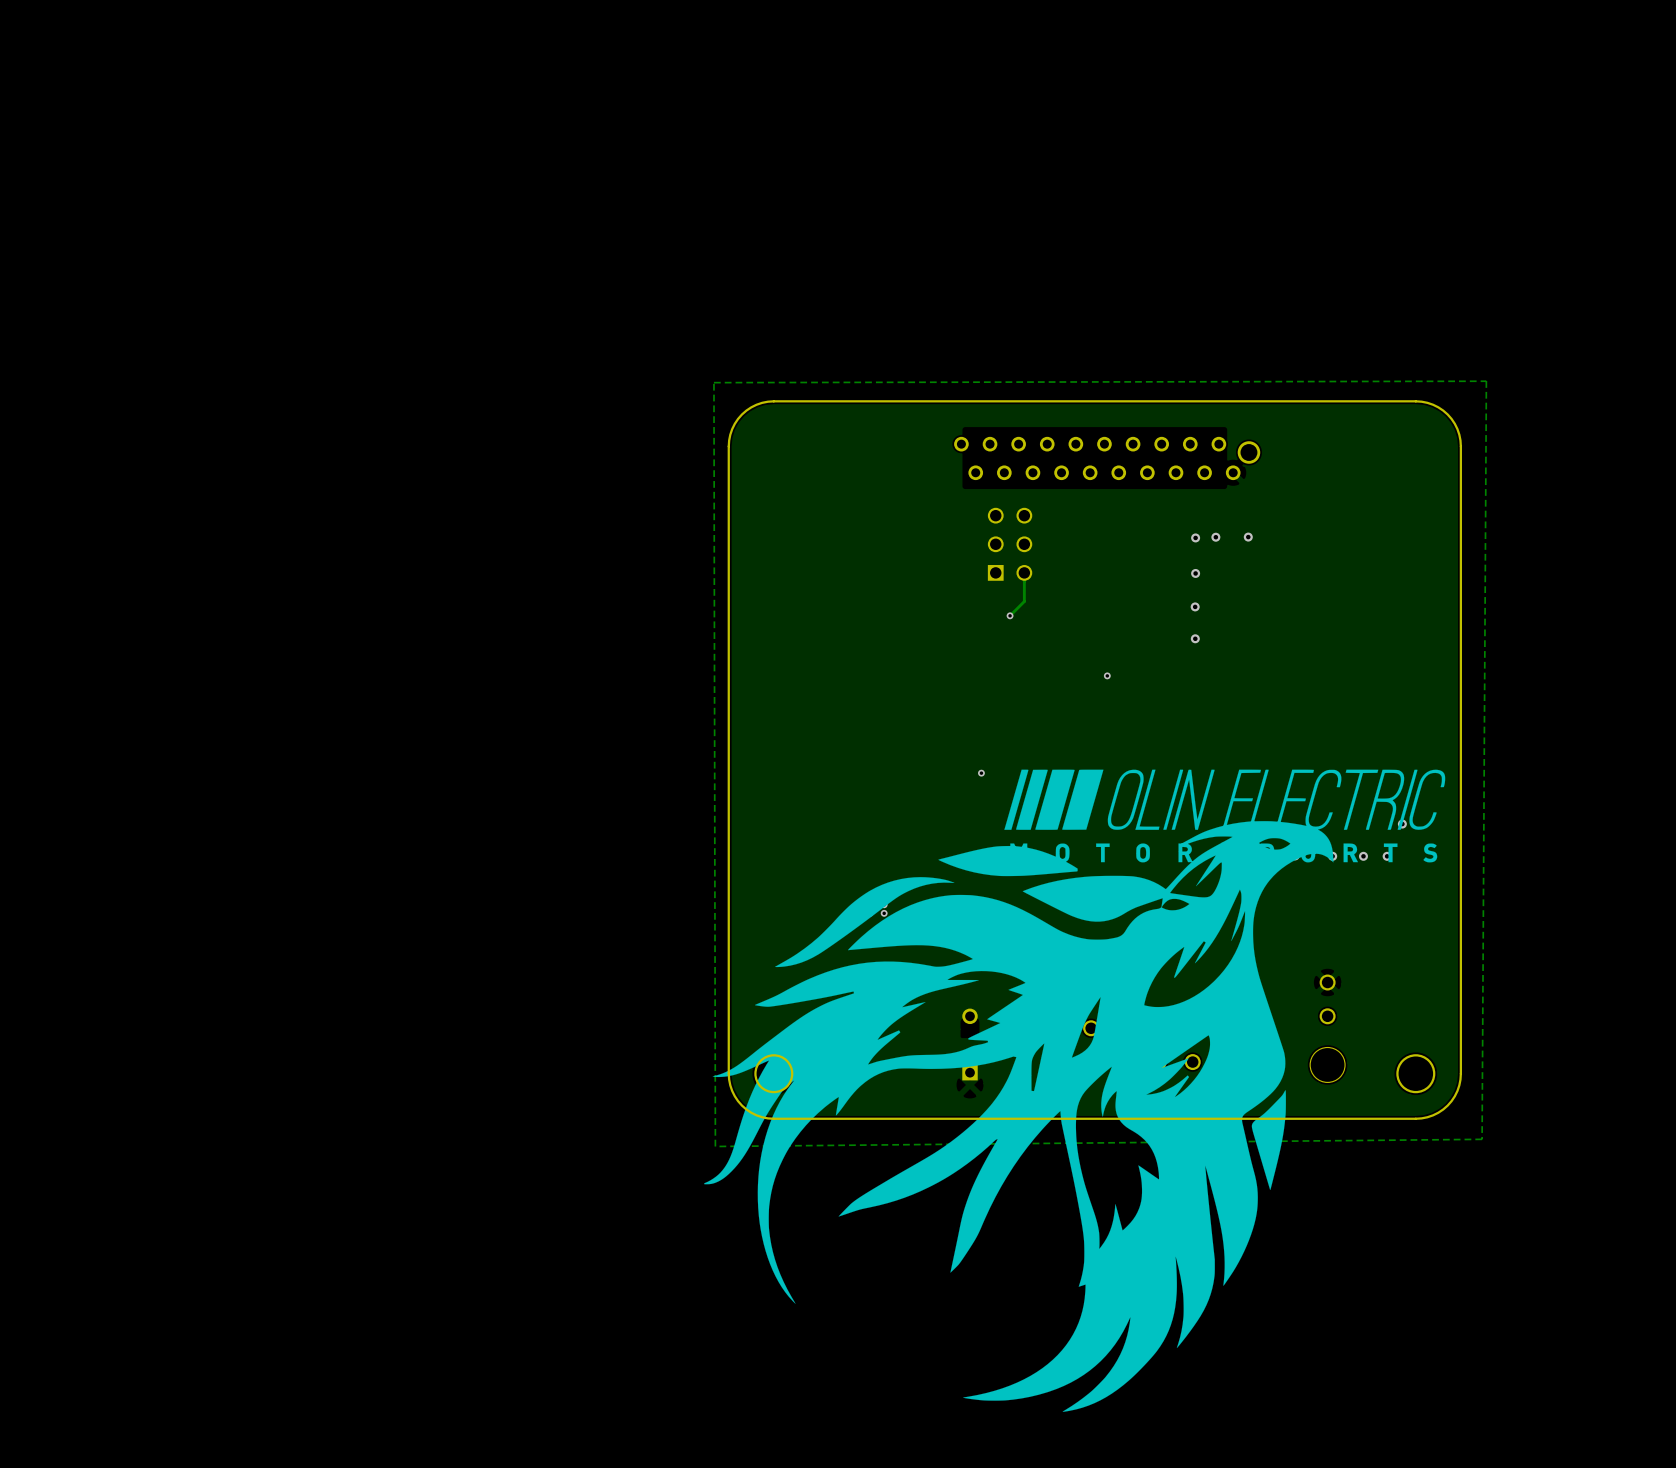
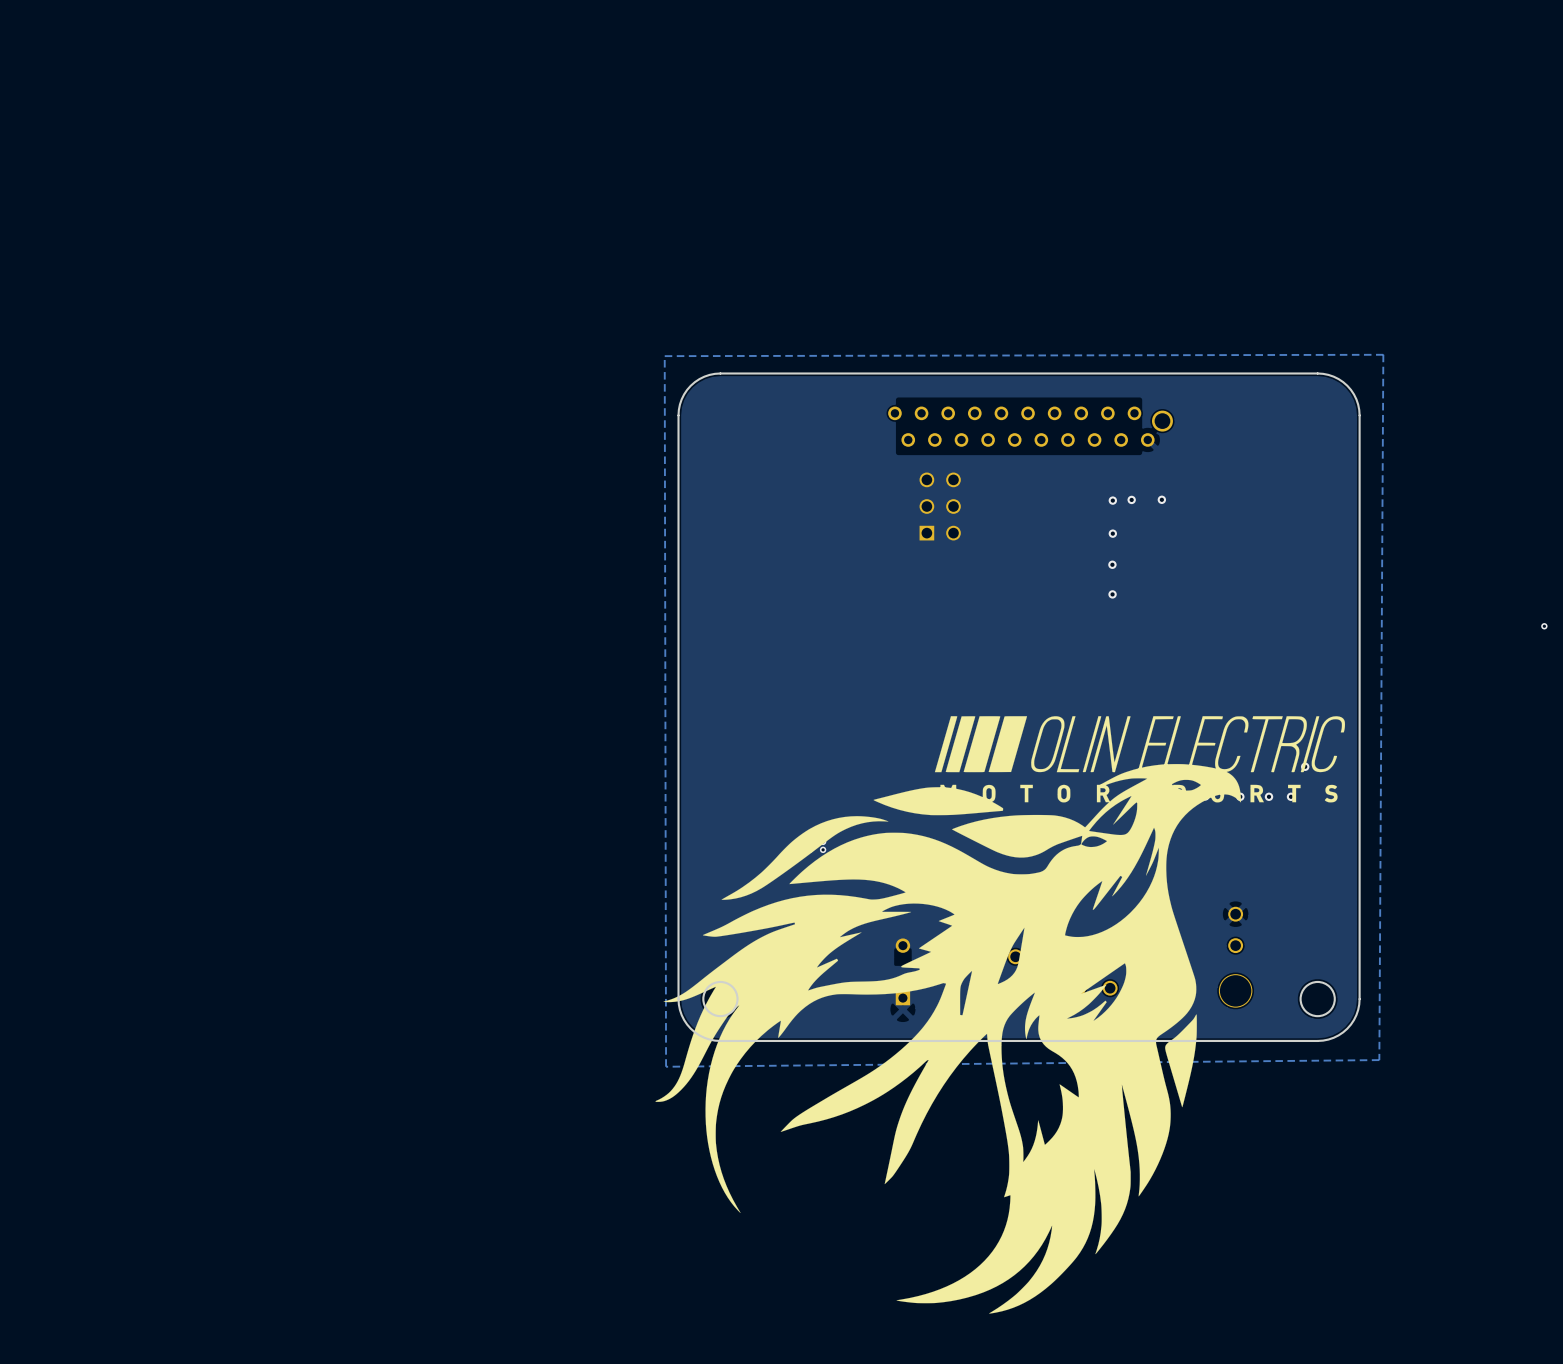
track: (1024, 572) (1024, 601) (1010, 615) -> none
via: (1010, 615) -> none
via: none -> (1544, 626)
via: (1107, 675) -> none
via: (981, 773) -> none

